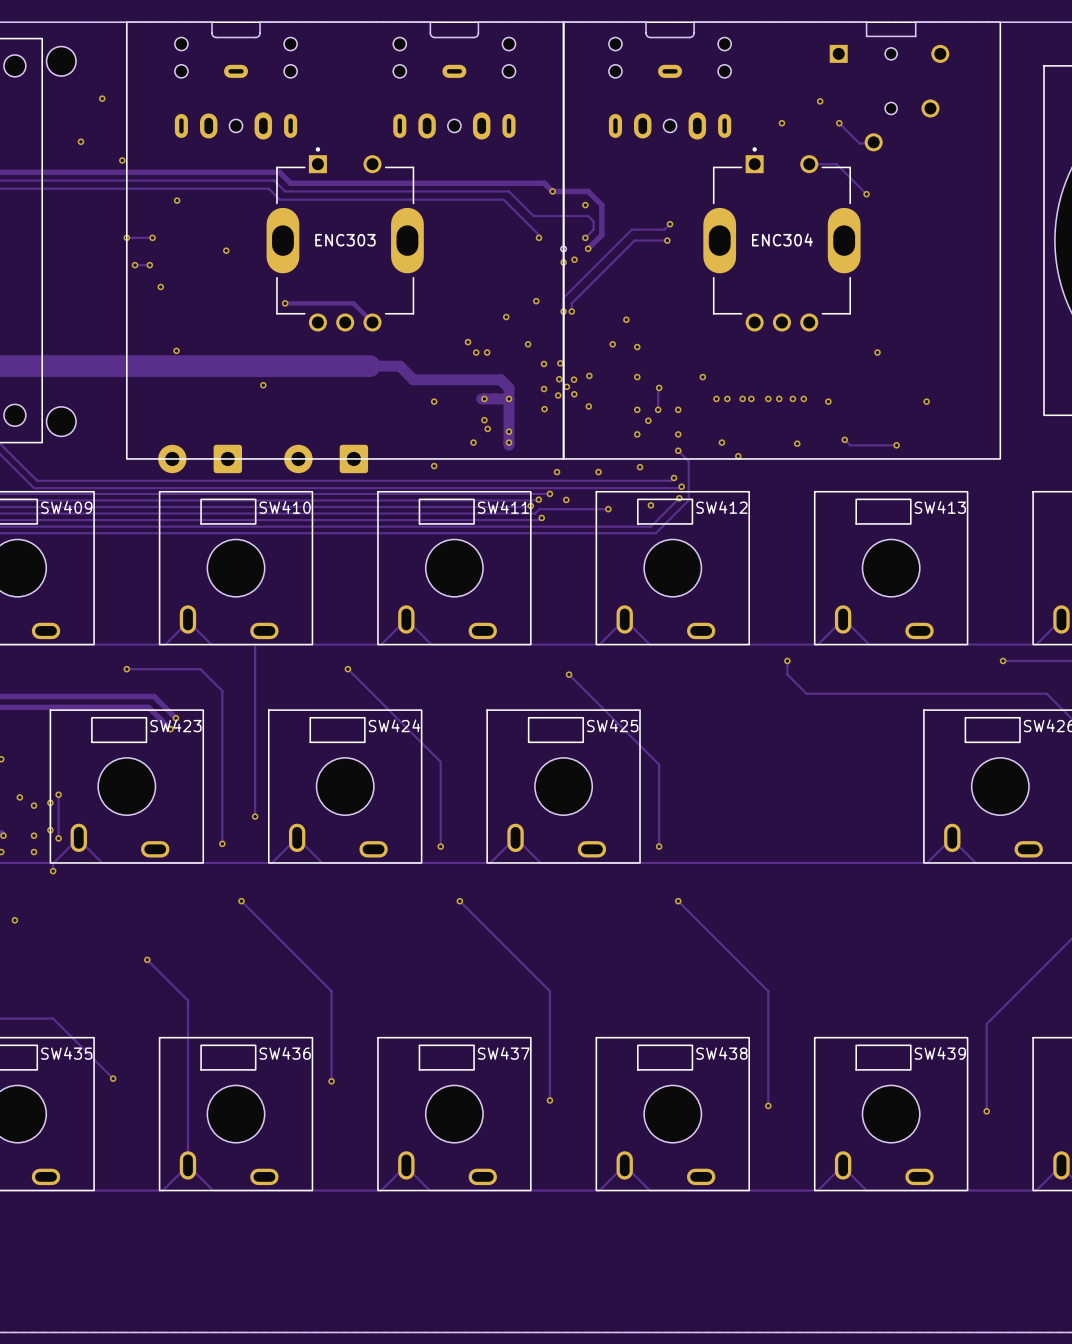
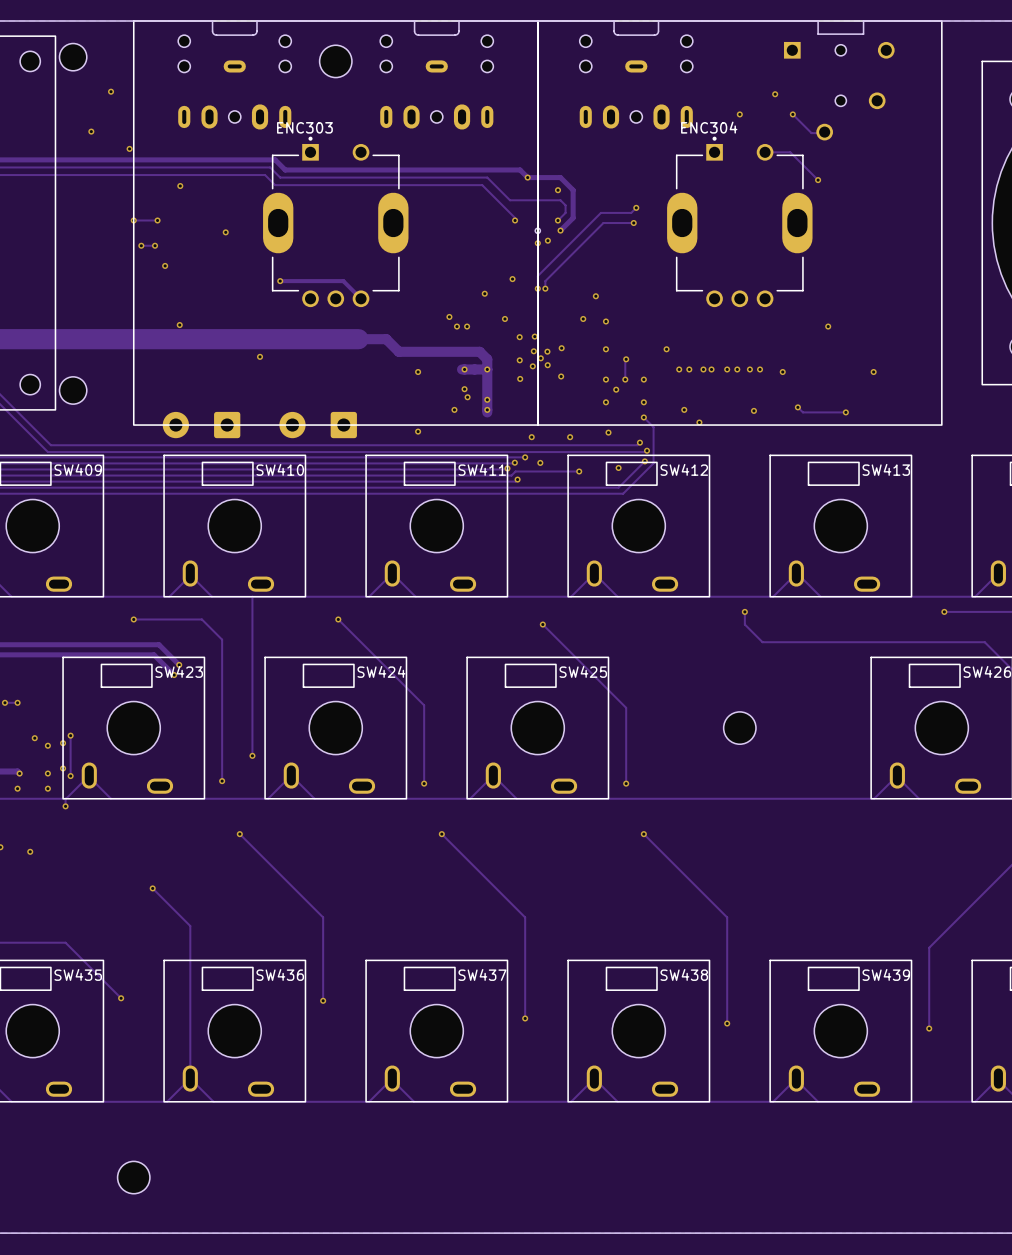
part: none -> (335, 61)
ENC304 name position: ENC304 (782, 239) -> ENC304 (709, 127)
ENC303 name position: ENC303 (345, 240) -> ENC303 (304, 127)
part: none -> (739, 728)
part: none -> (133, 1177)

